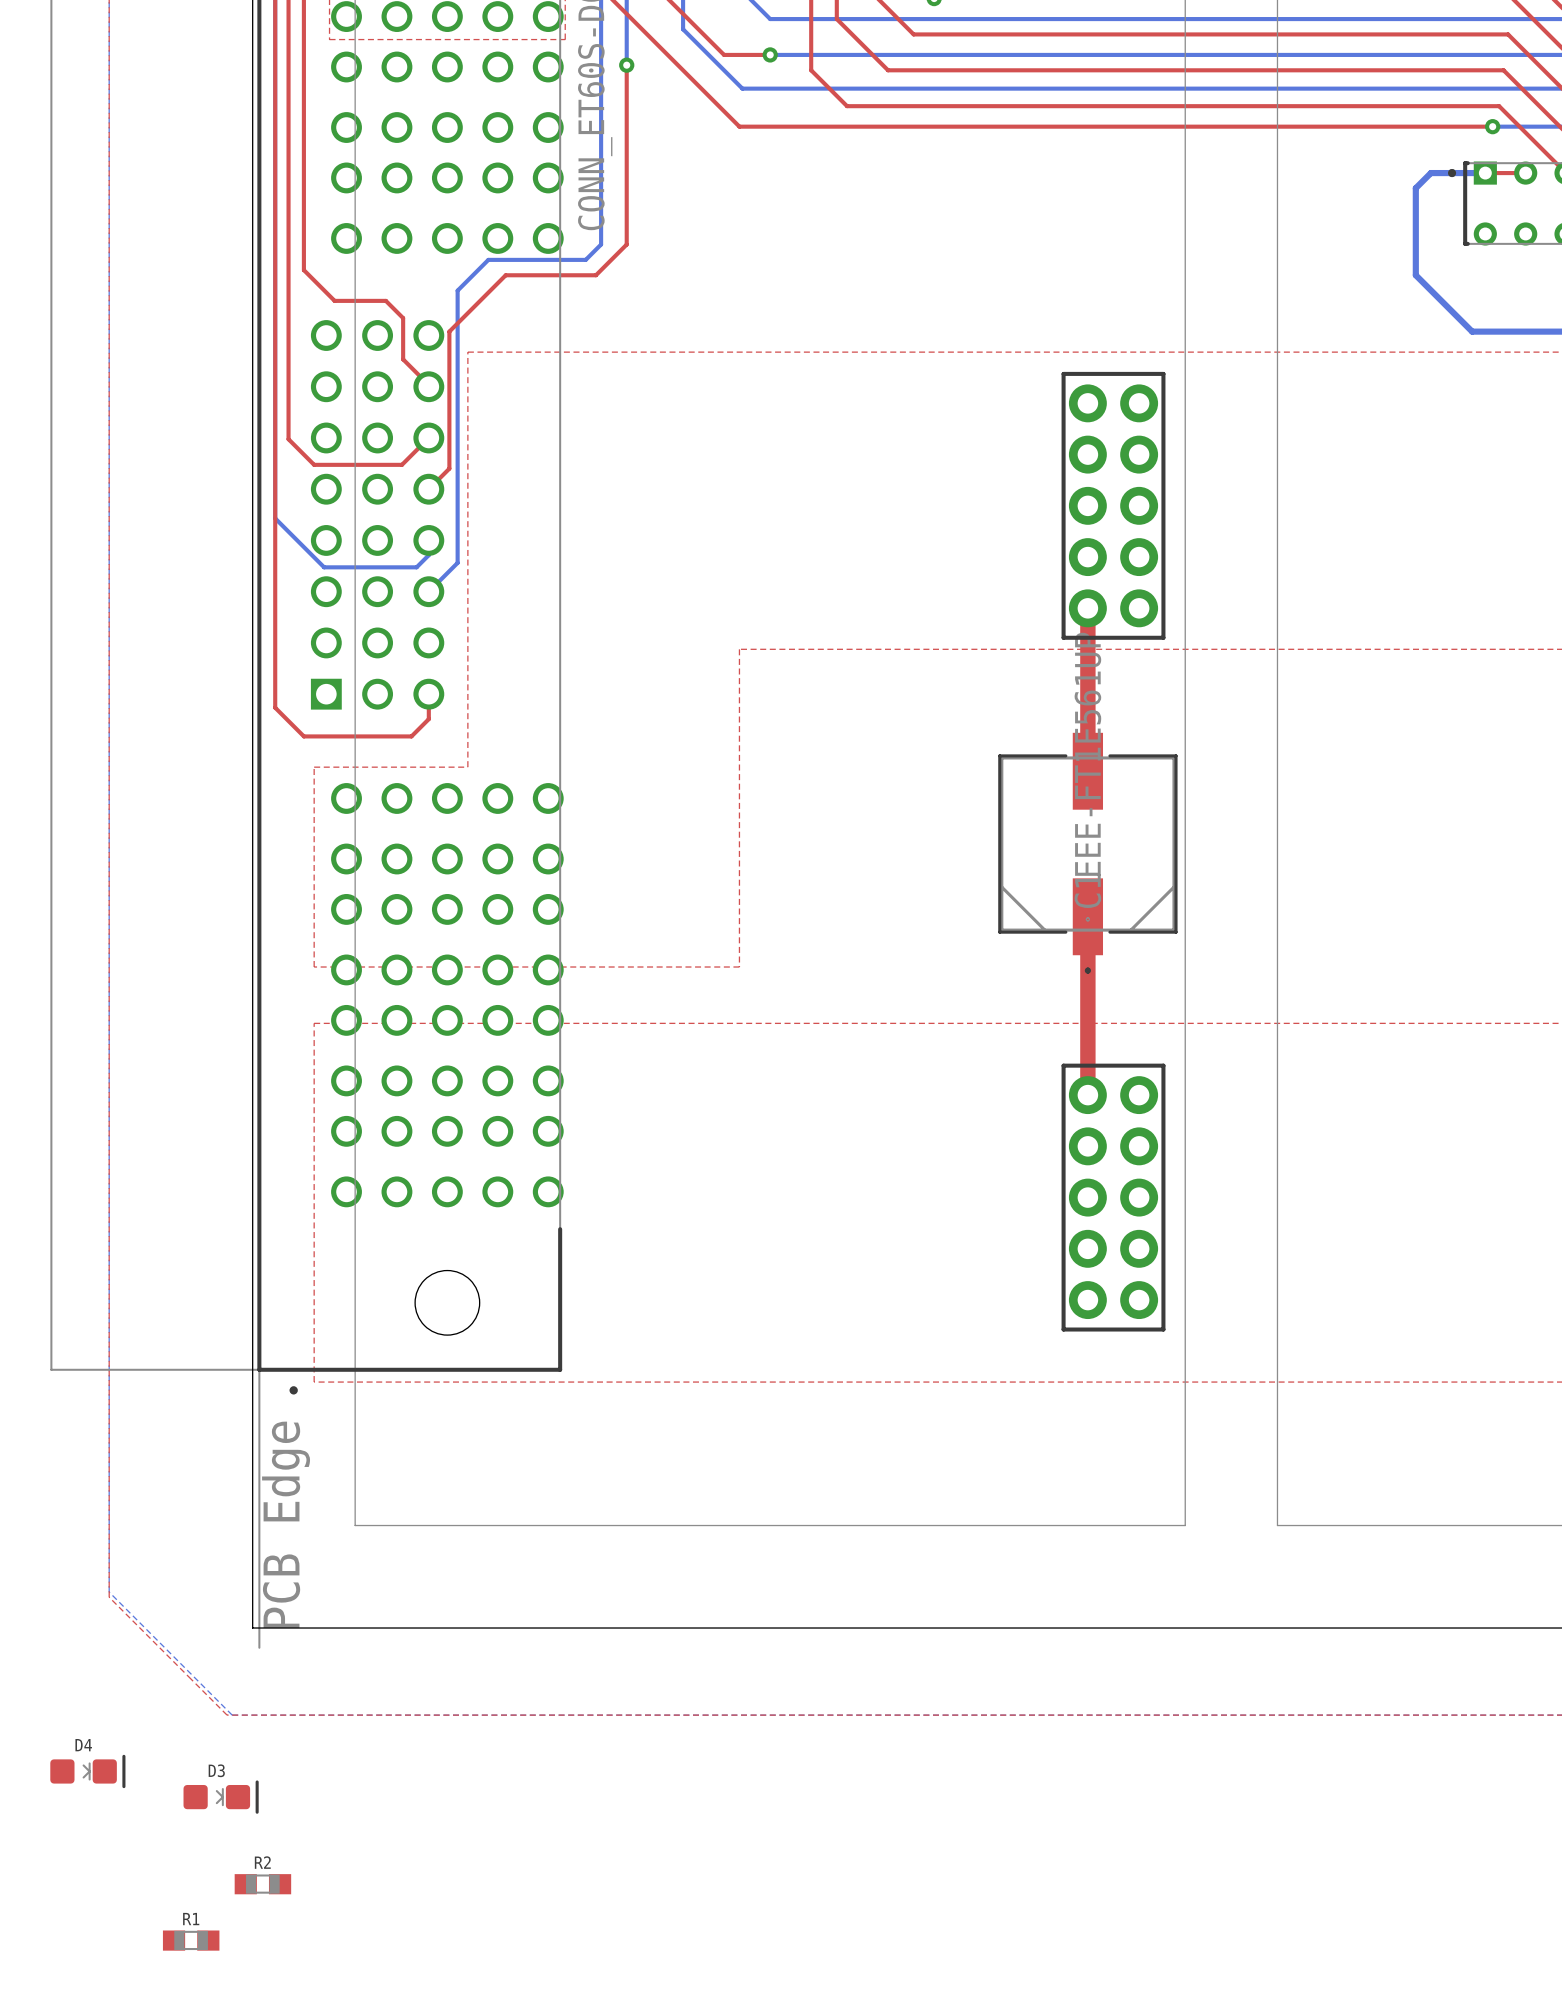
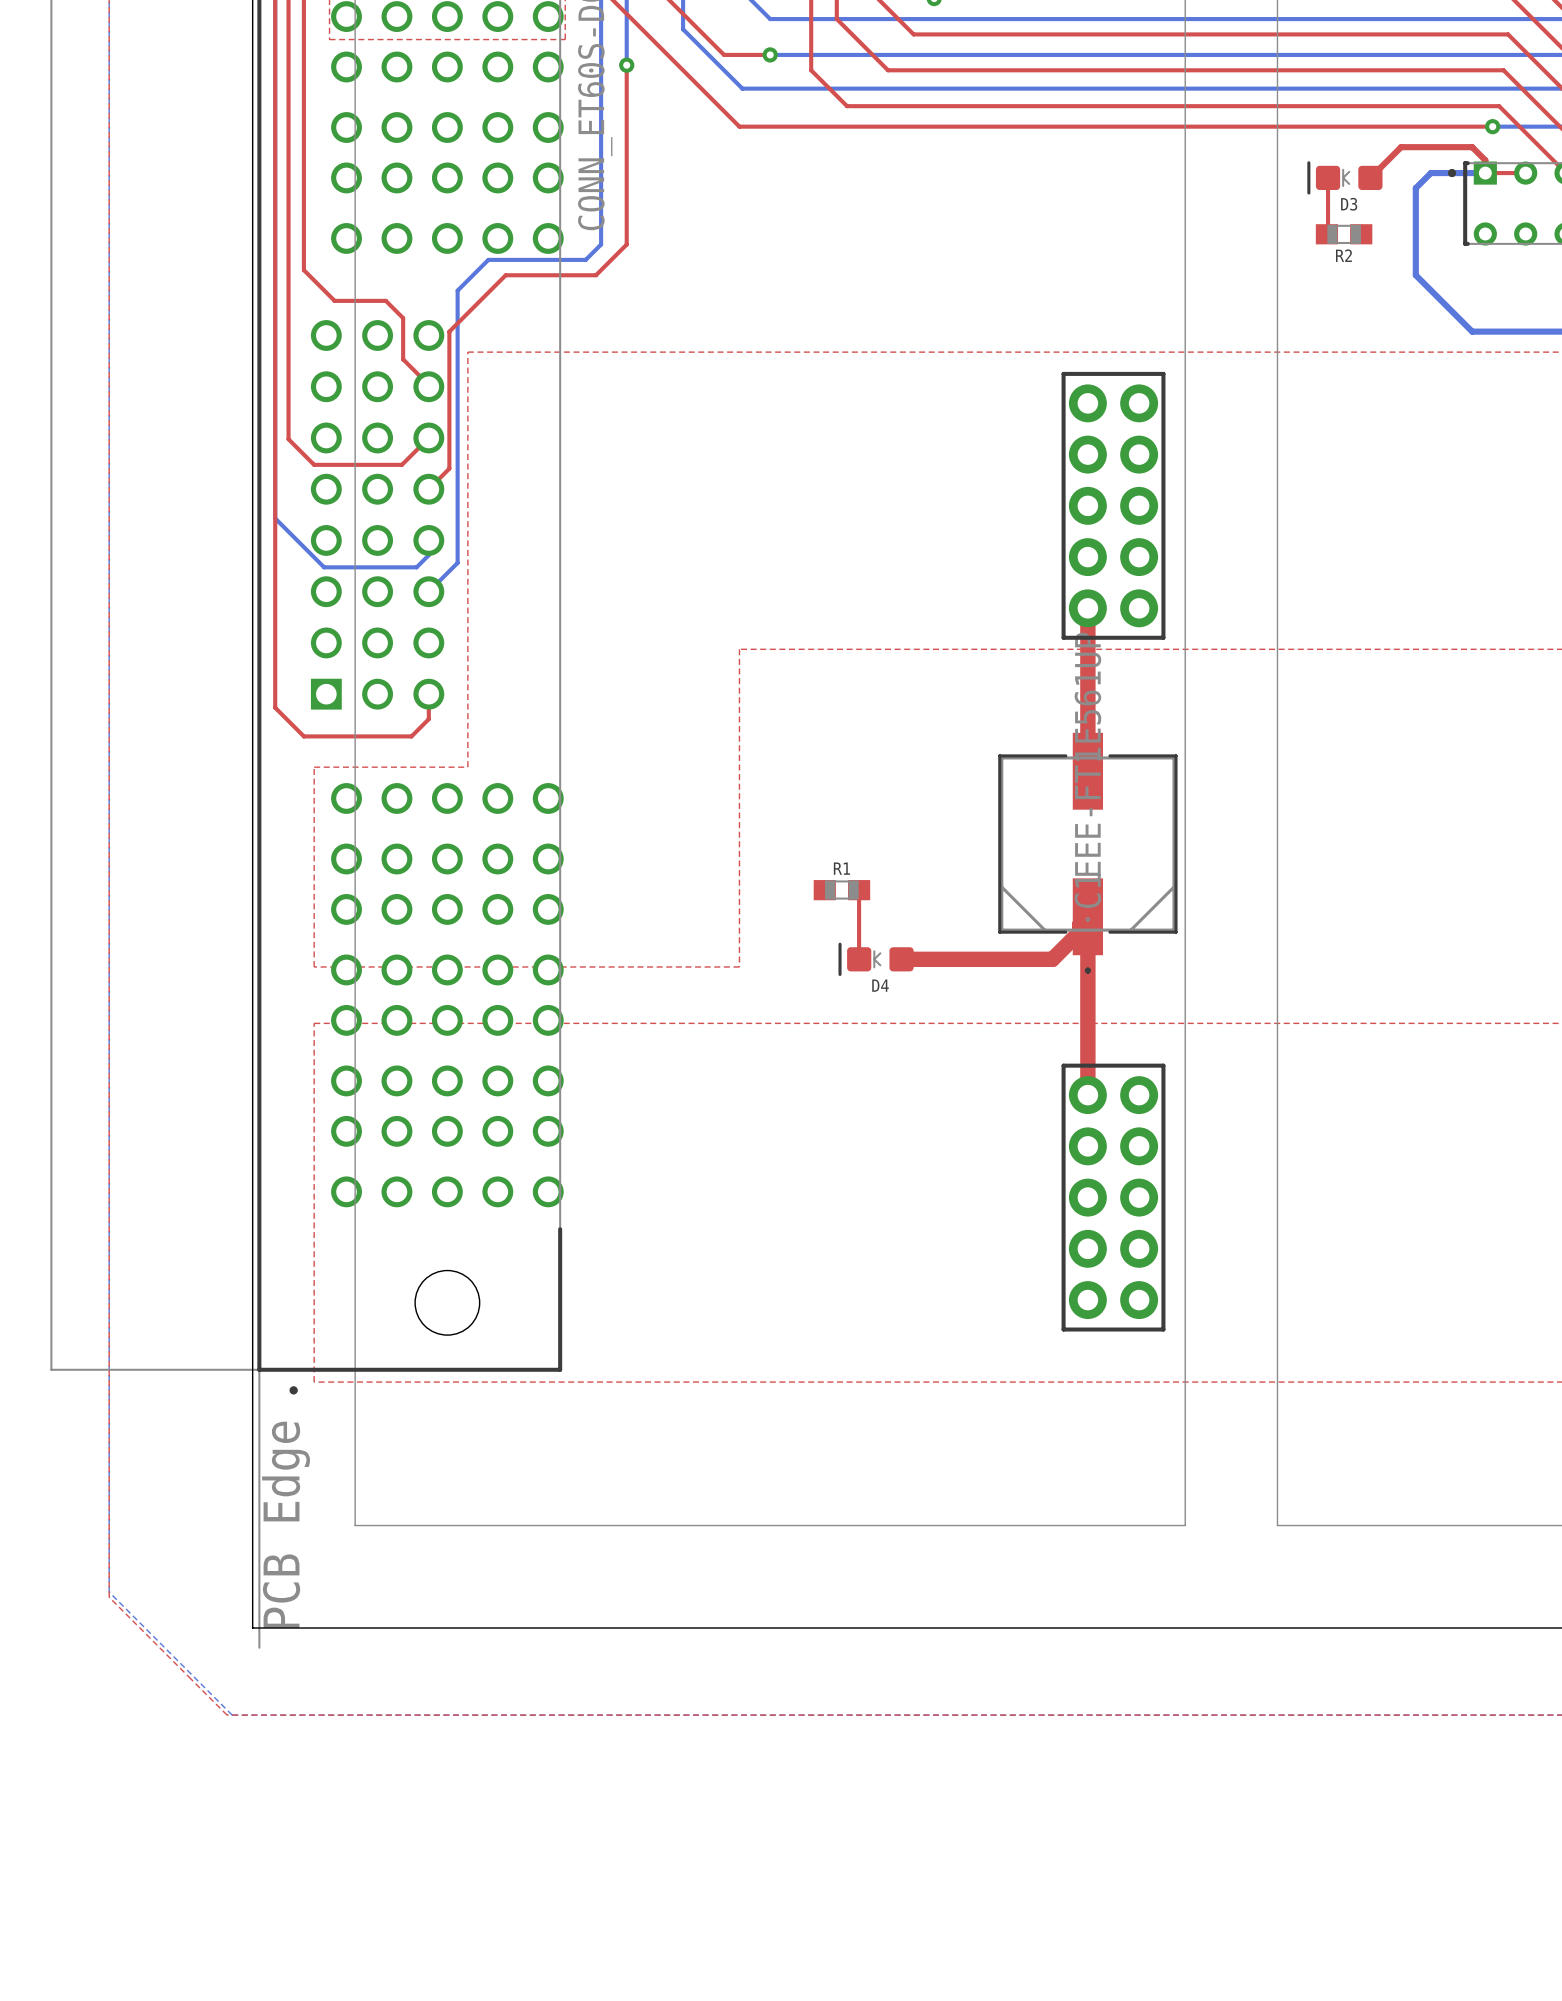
top track: none -> (1485, 173) (1485, 160) (1472, 147) (1401, 147) (1370, 177)
top track: none -> (1328, 177) (1326, 234)
top track: none -> (859, 890) (859, 959)
top track: none -> (1087, 916) (1079, 924) (1079, 932) (1052, 959) (901, 959)
D4 rotation: 0° (87, 1771) -> 180° (876, 959)
D4 position: (87, 1771) -> (876, 959)
D3 rotation: 0° (221, 1797) -> 180° (1344, 177)
D3 position: (221, 1797) -> (1344, 177)
R2 name position: R2 (262, 1862) -> R2 (1343, 255)
R2 position: (262, 1884) -> (1344, 234)
R1 position: (191, 1940) -> (841, 890)

